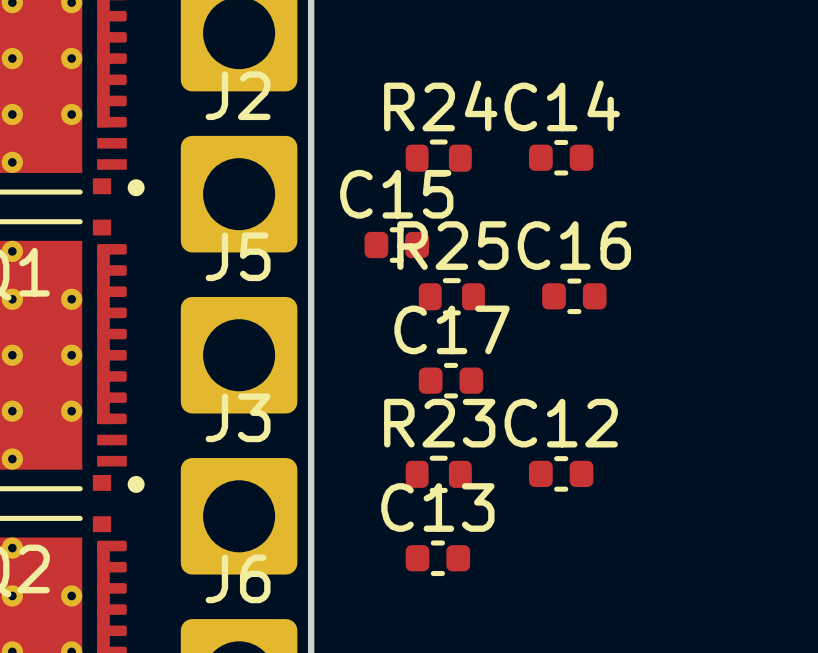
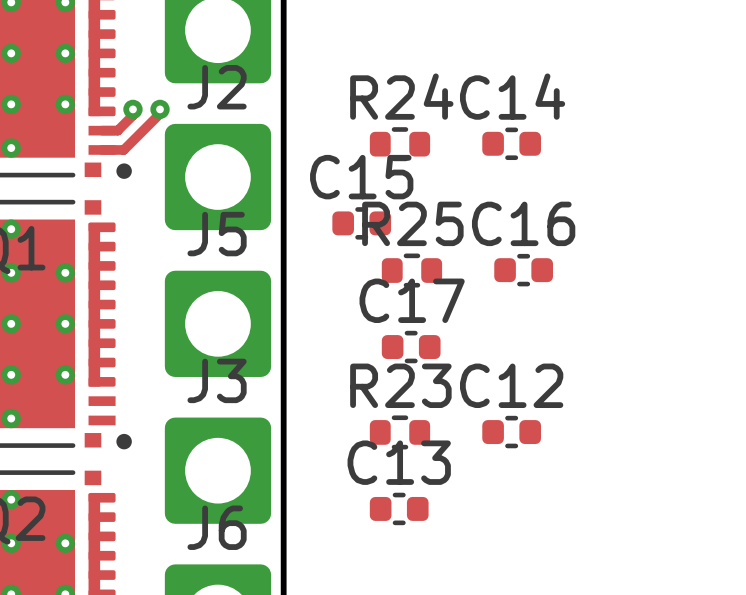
track: none -> (132, 109) (132, 115) (117, 130) (102, 130)
via: none -> (132, 109)
track: none -> (160, 109) (160, 113) (123, 149) (102, 149)
via: none -> (160, 109)

